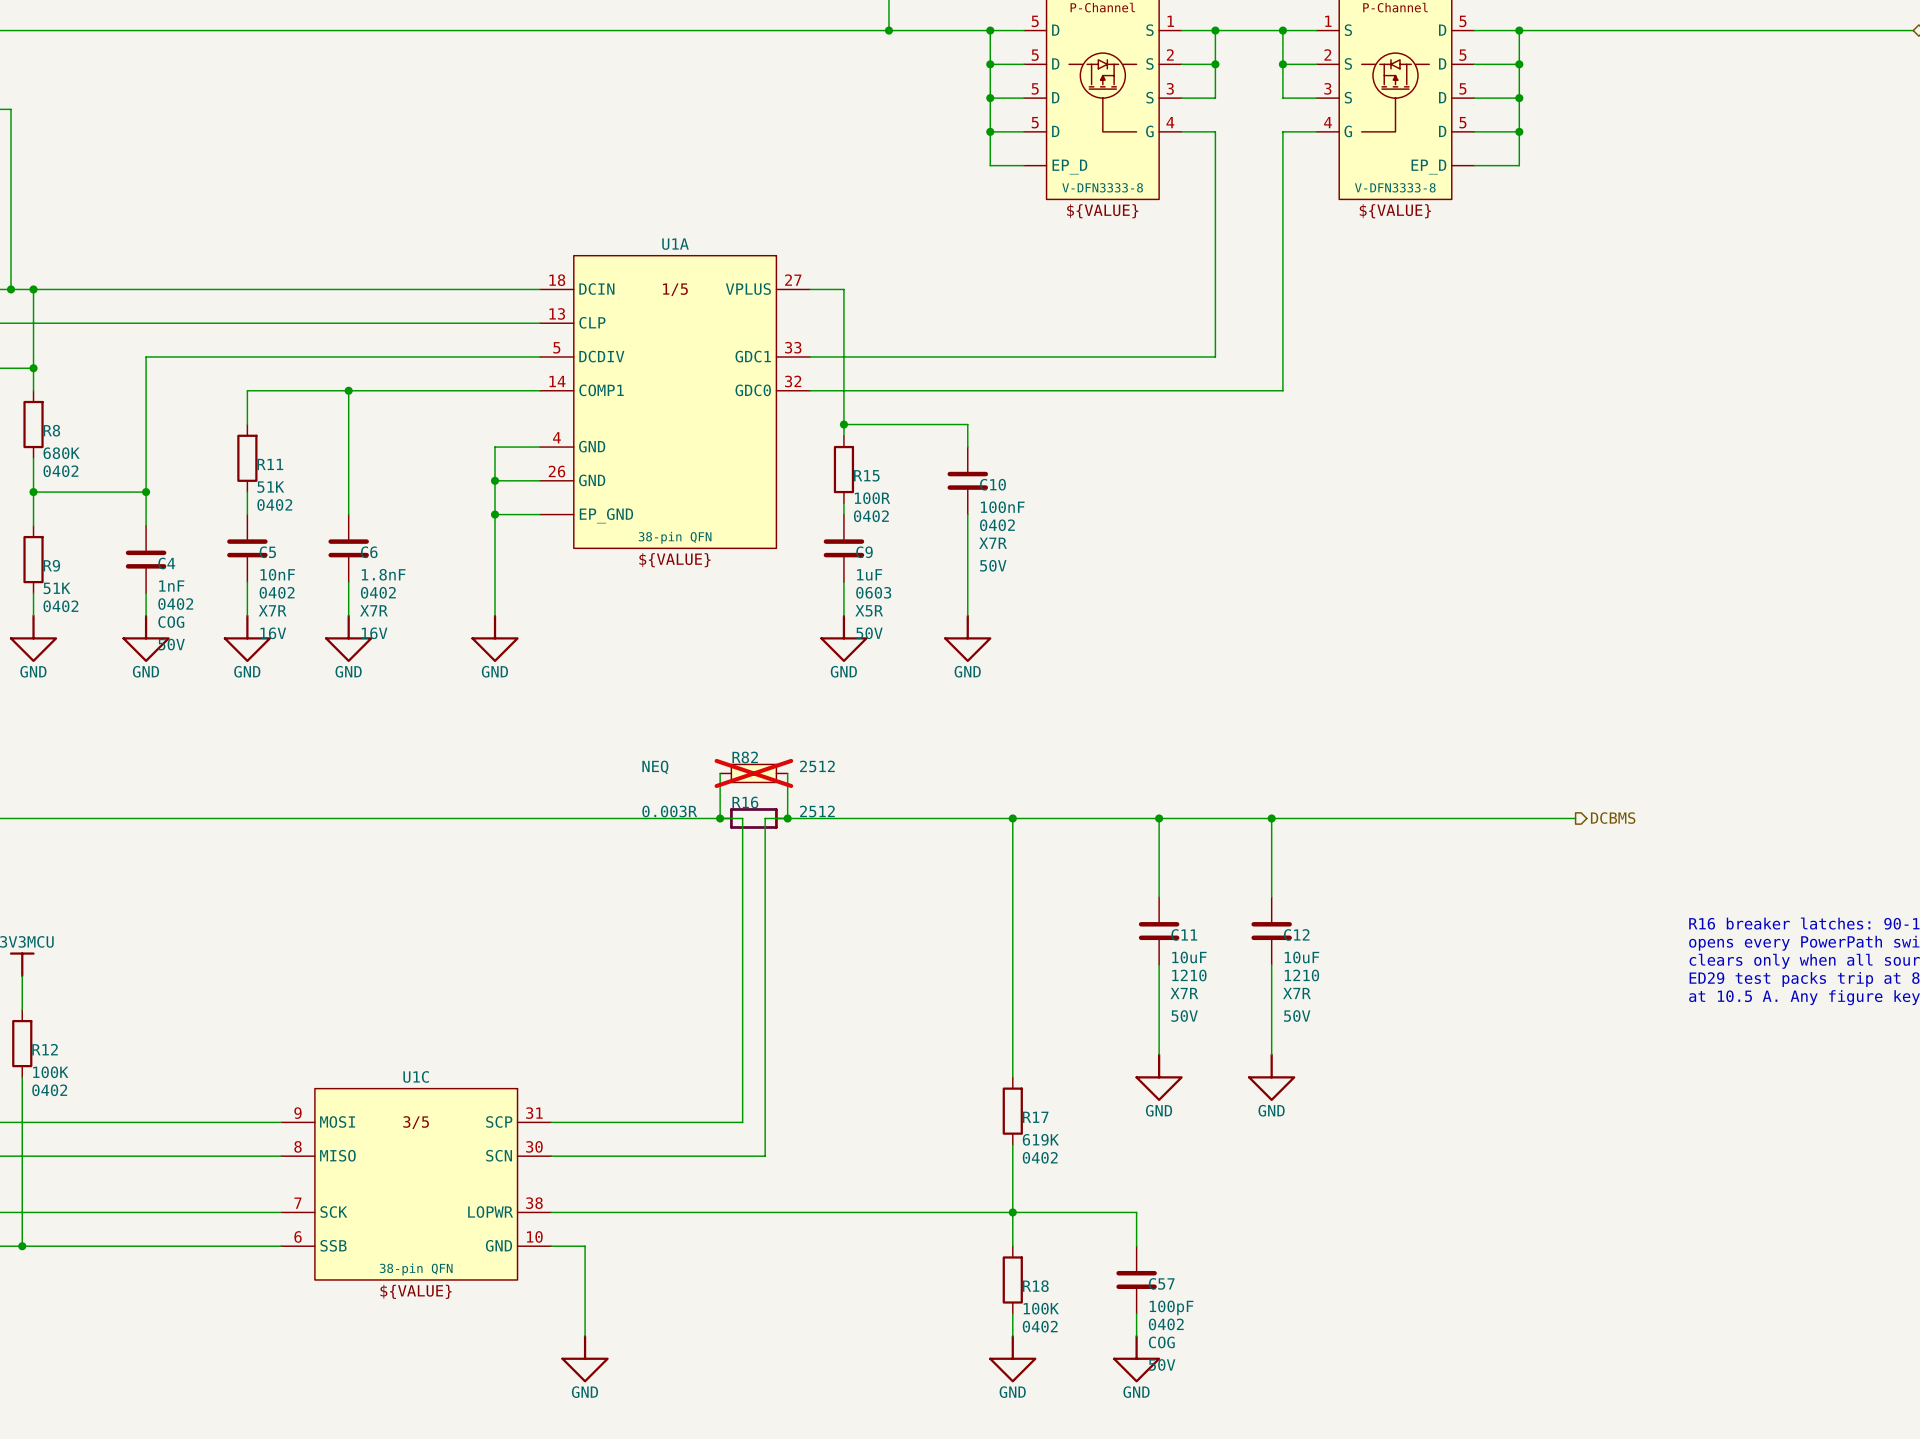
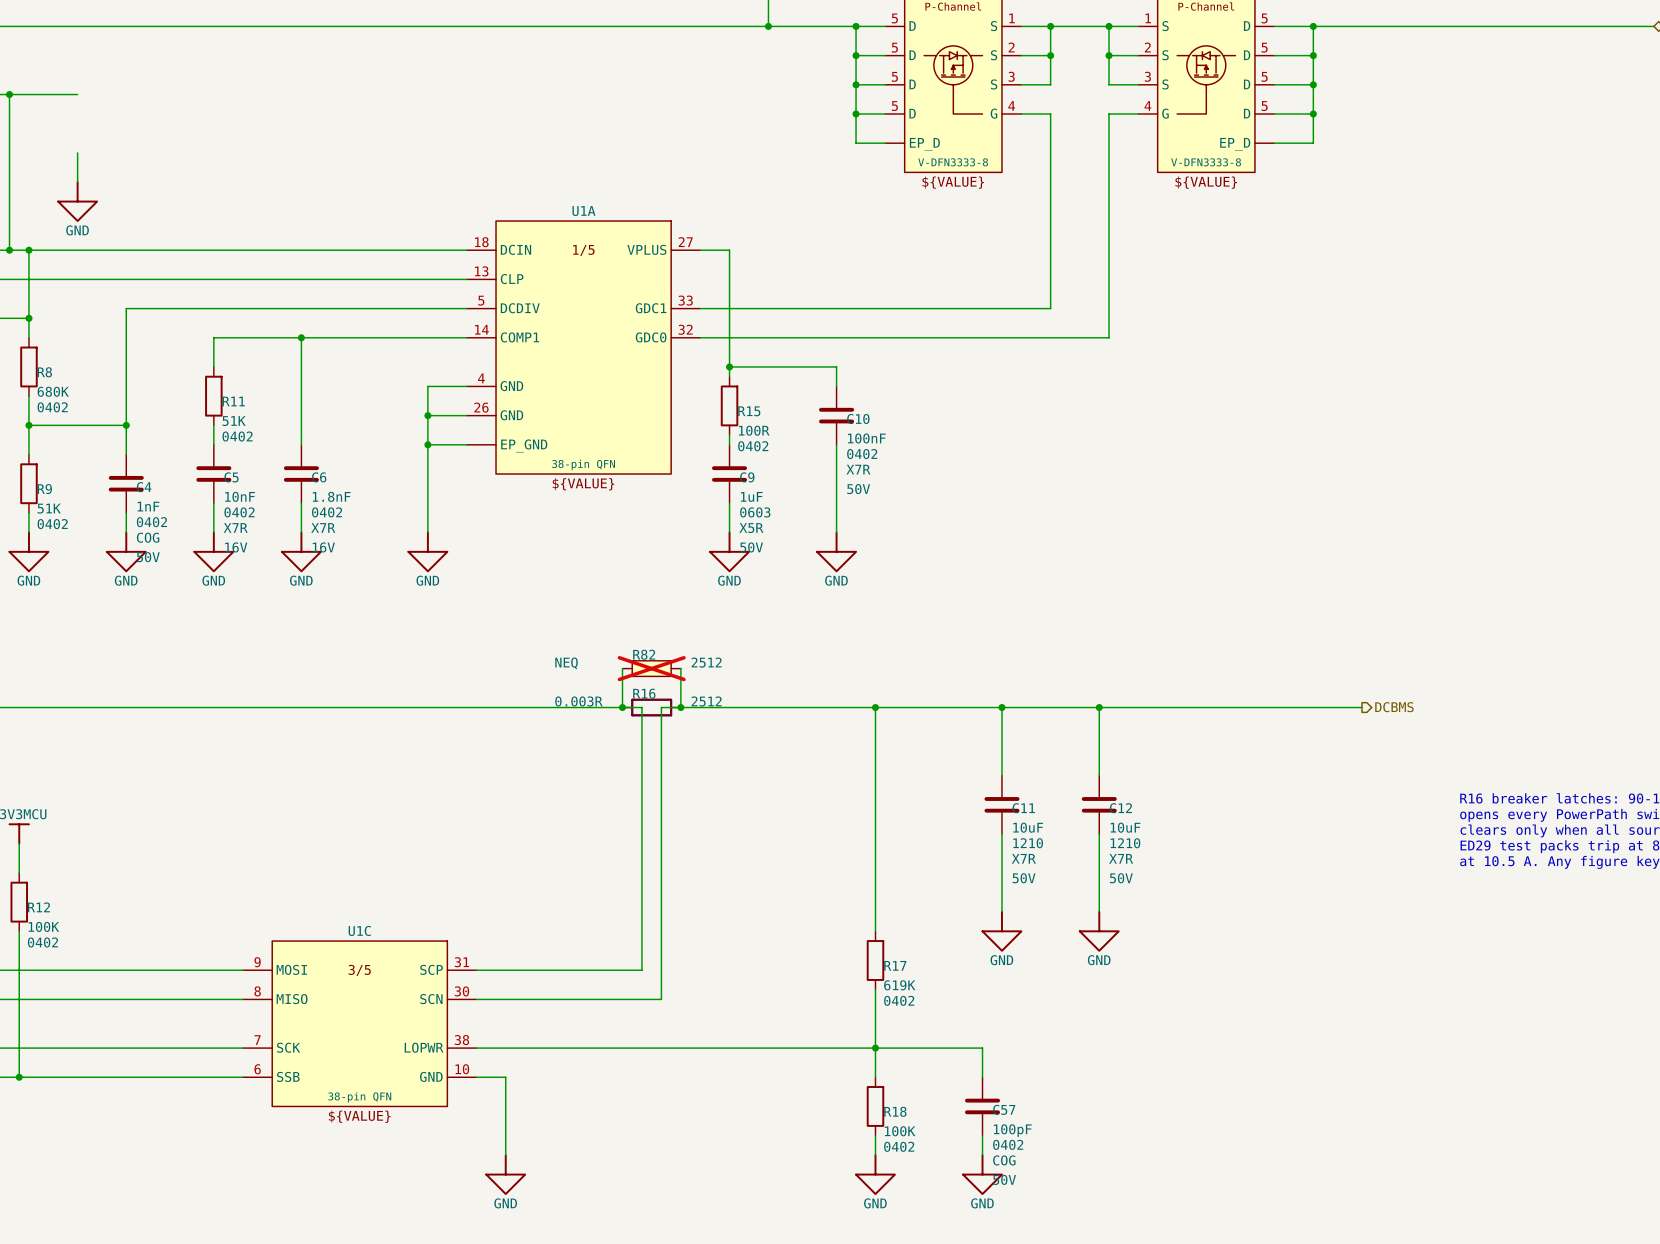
wire: none -> (9, 94) (77, 94)
junction: none -> (9, 94)
wire: none -> (77, 152) (77, 182)
power symbol: none -> GND (77, 201)

